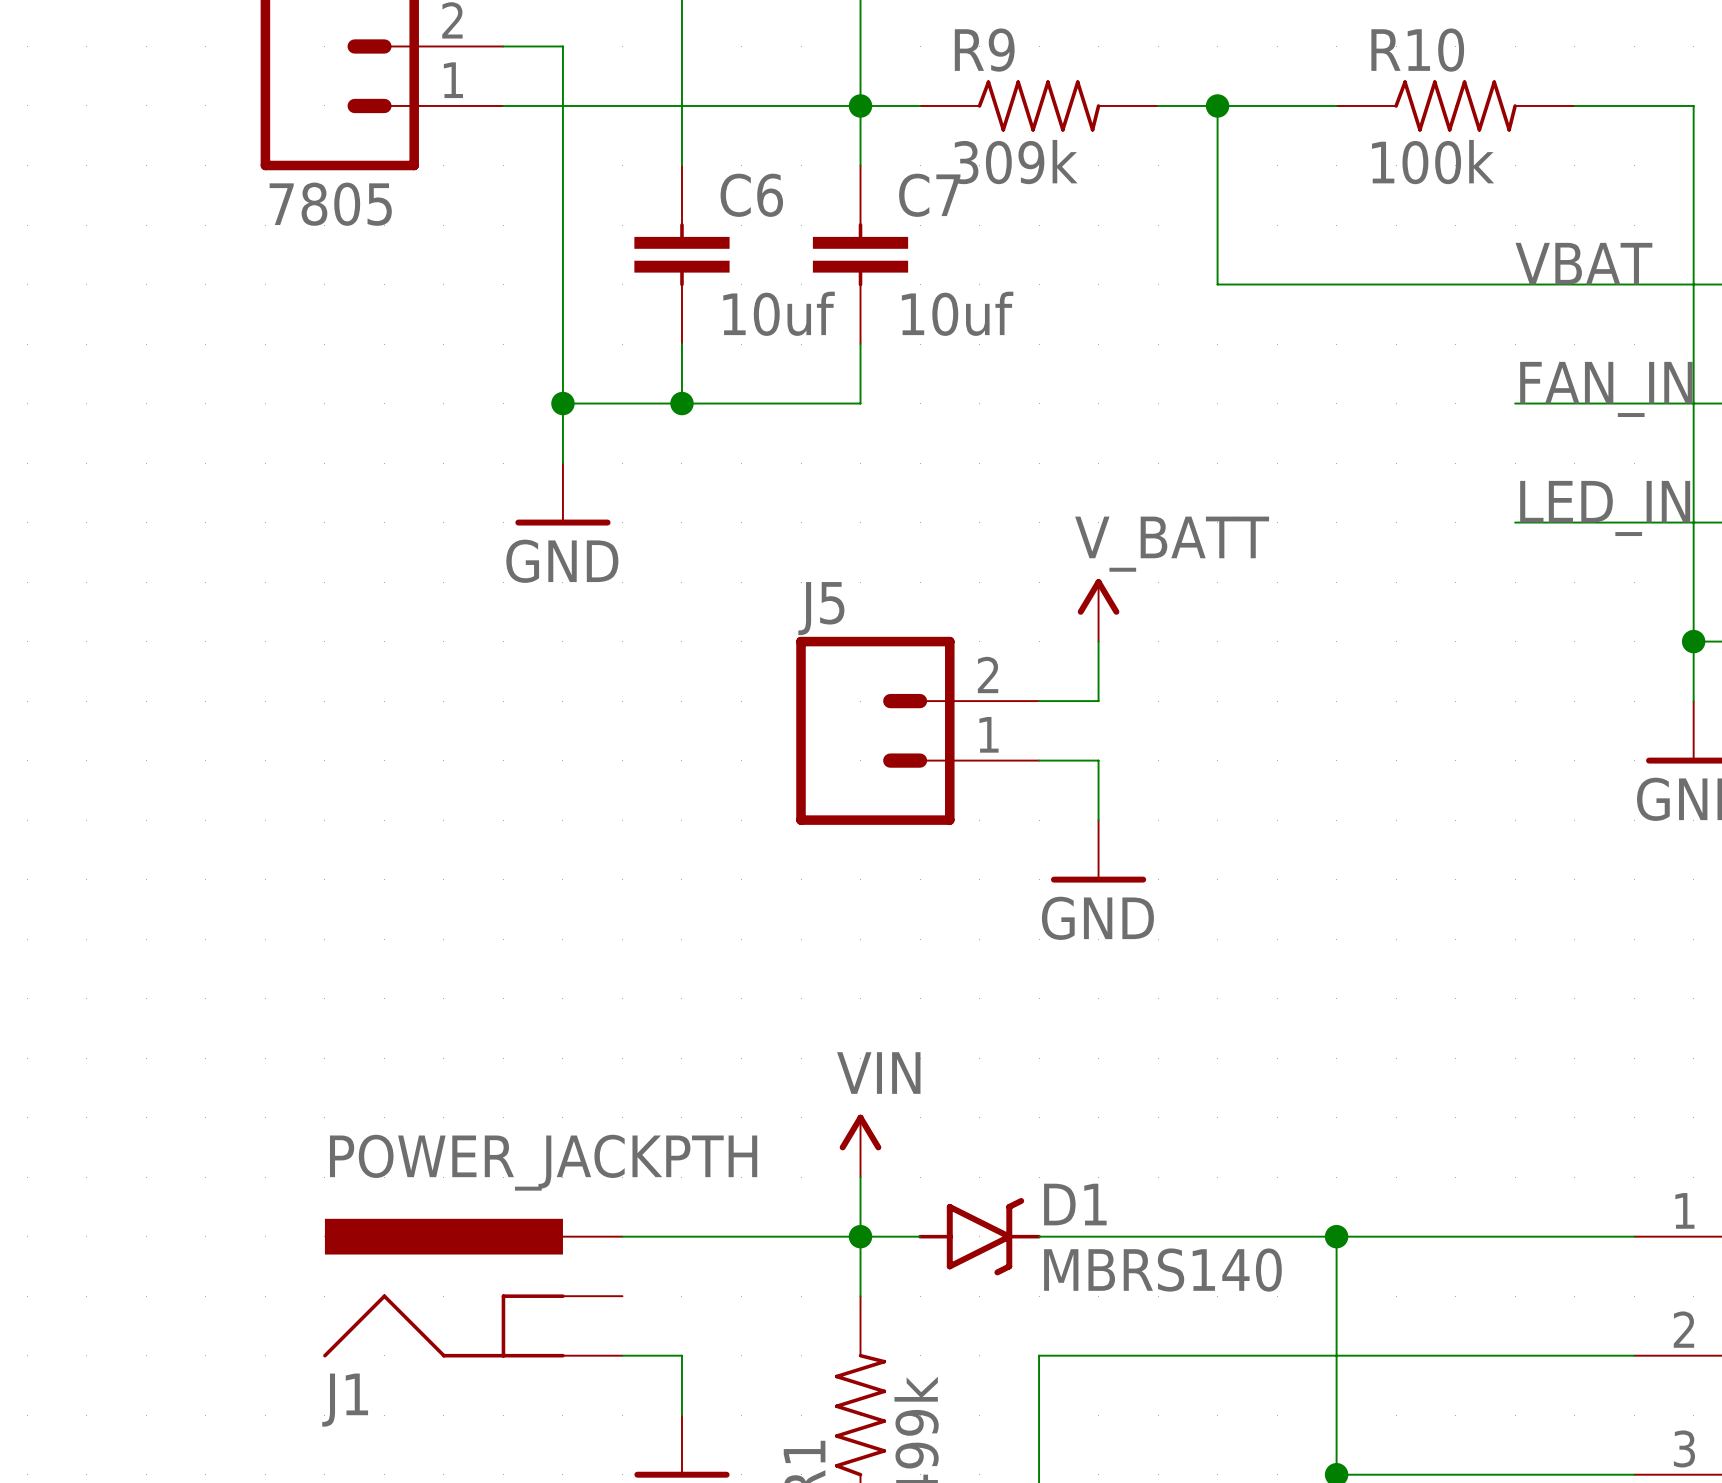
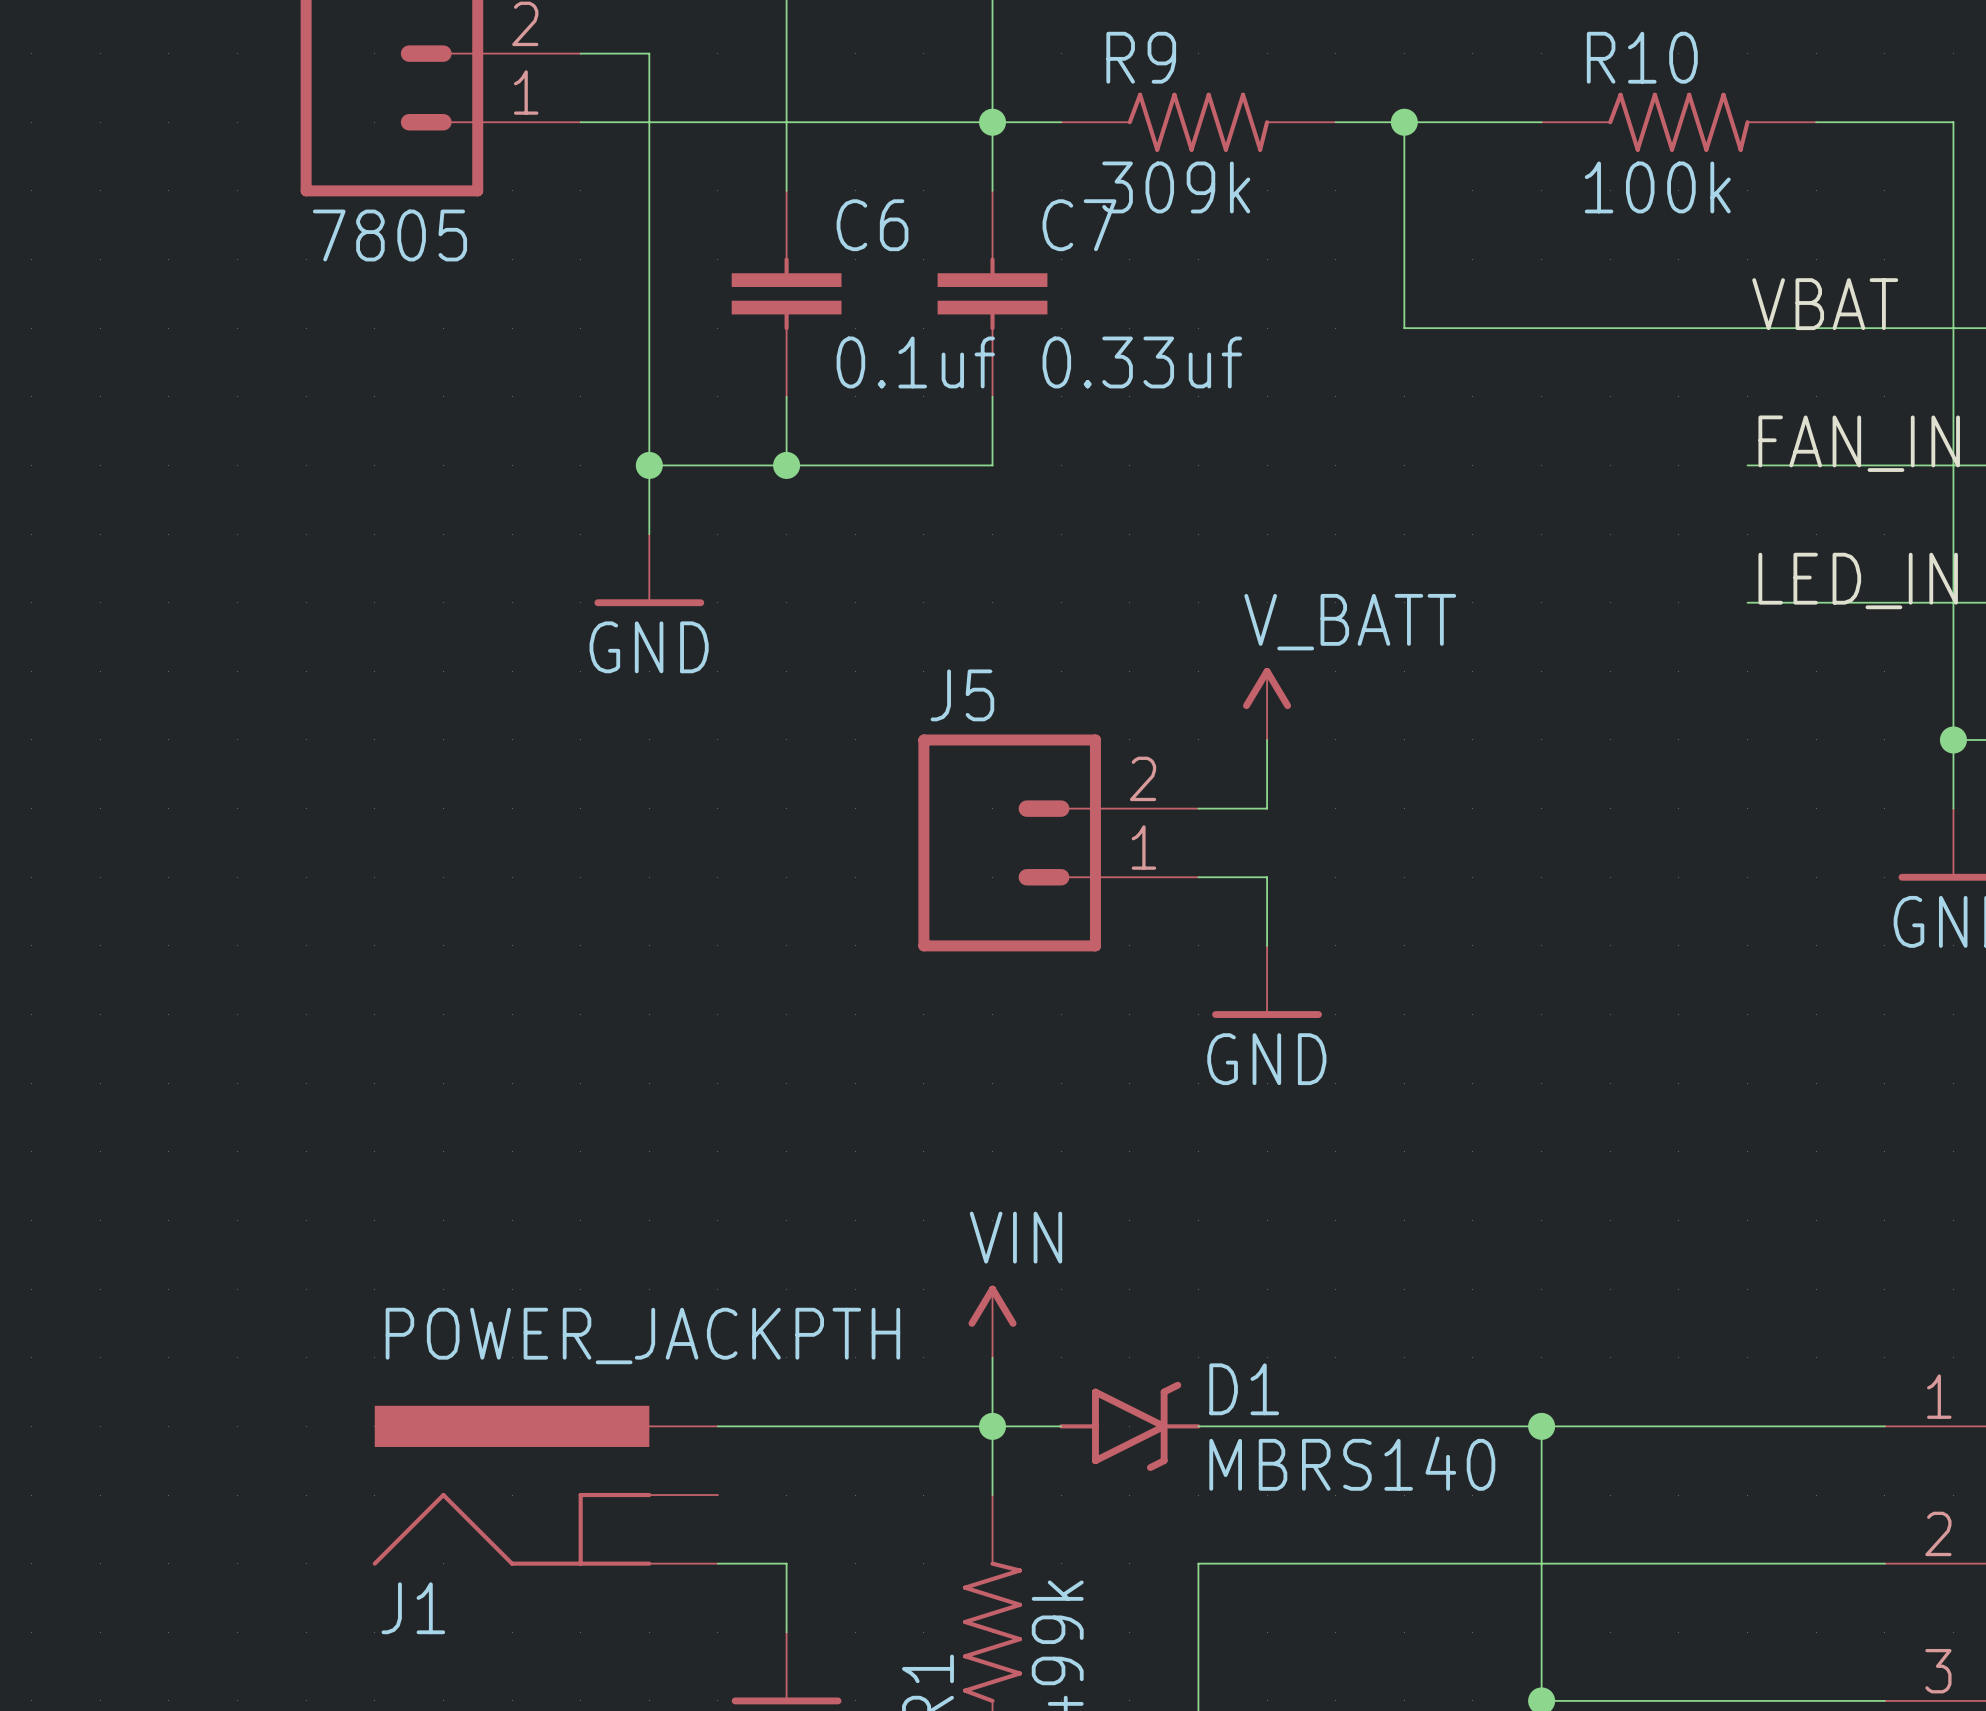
C6 value: 10uf (779, 313) -> 0.1uf (915, 362)
C7 value: 10uf (957, 313) -> 0.33uf (1142, 362)

